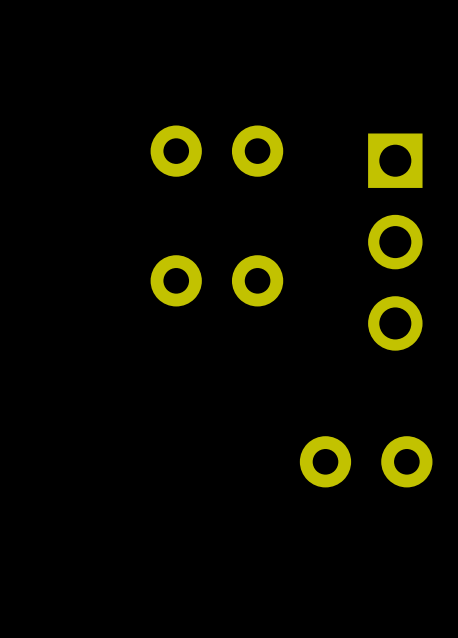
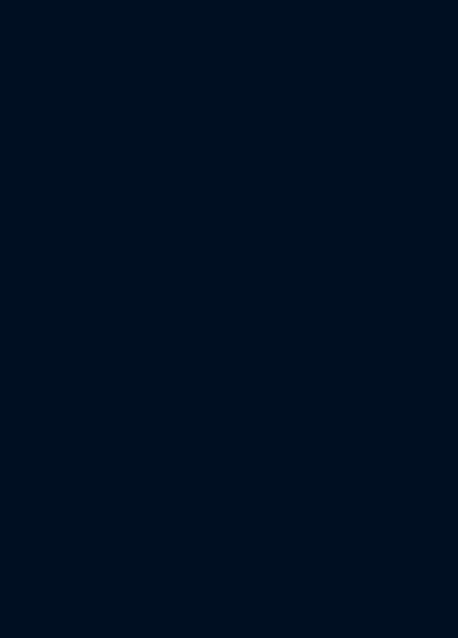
part: (216, 151) -> none
part: (395, 242) -> none
part: (216, 280) -> none
part: (366, 461) -> none

